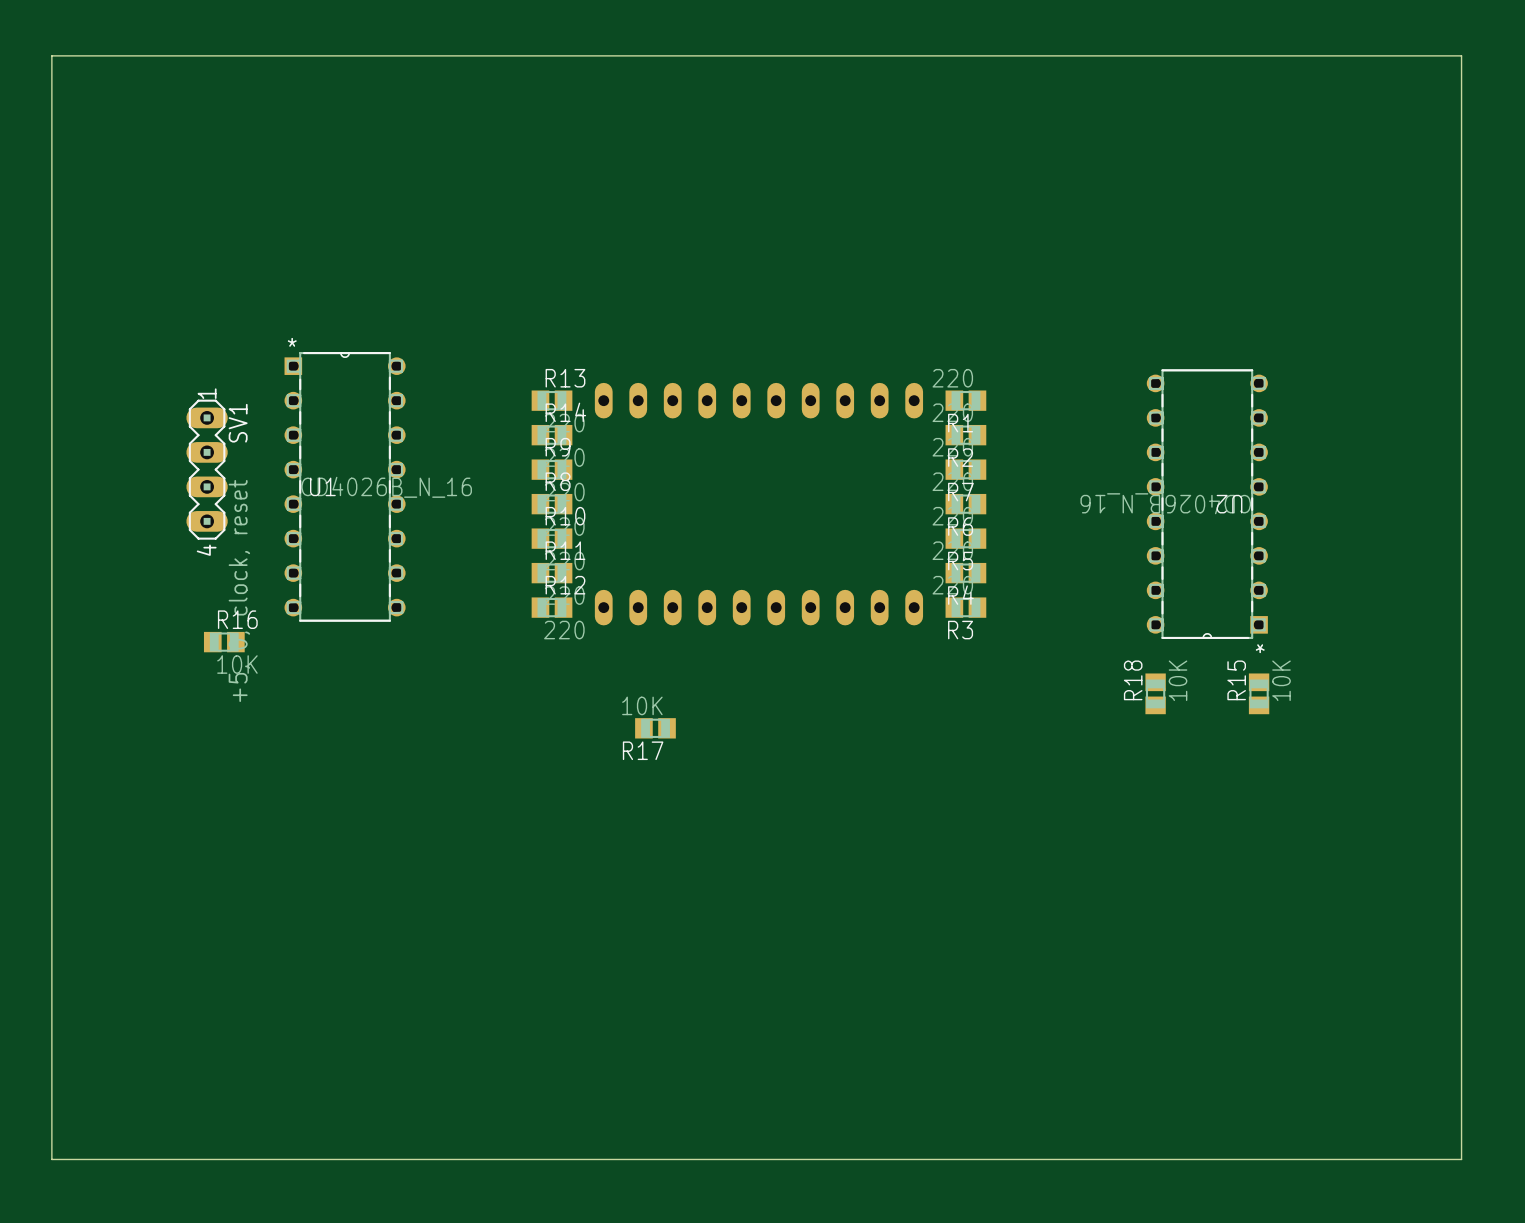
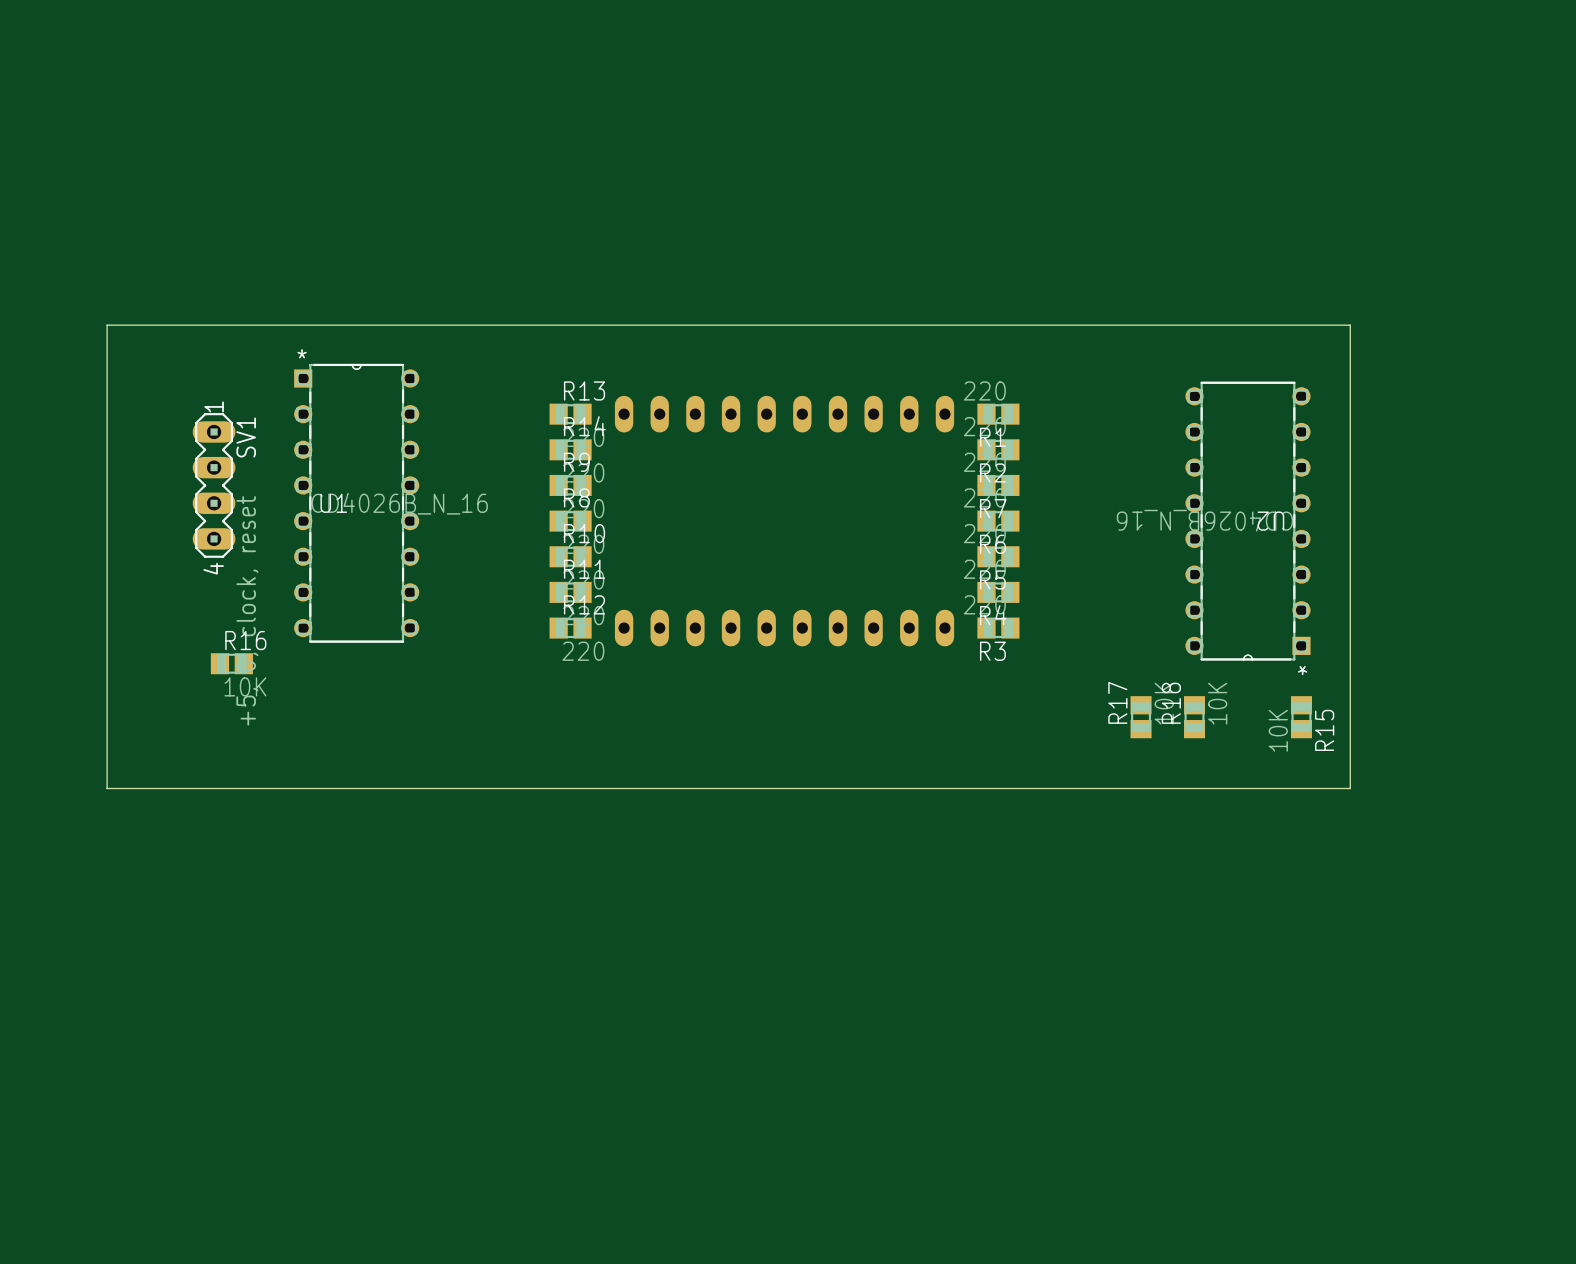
board edge: (51, 55) (1461, 55) (1461, 1159) (51, 1159) (51, 55) -> none
board edge: none -> (107, 325) (1350, 325) (1350, 788) (107, 788) (107, 325)
R15 name position: R15 (1236, 680) -> R15 (1324, 730)
R15 value position: 10K (1281, 680) -> 10K (1278, 730)
R17 rotation: 0° (655, 728) -> 90° clockwise (1141, 717)
R17 position: (655, 728) -> (1141, 717)

